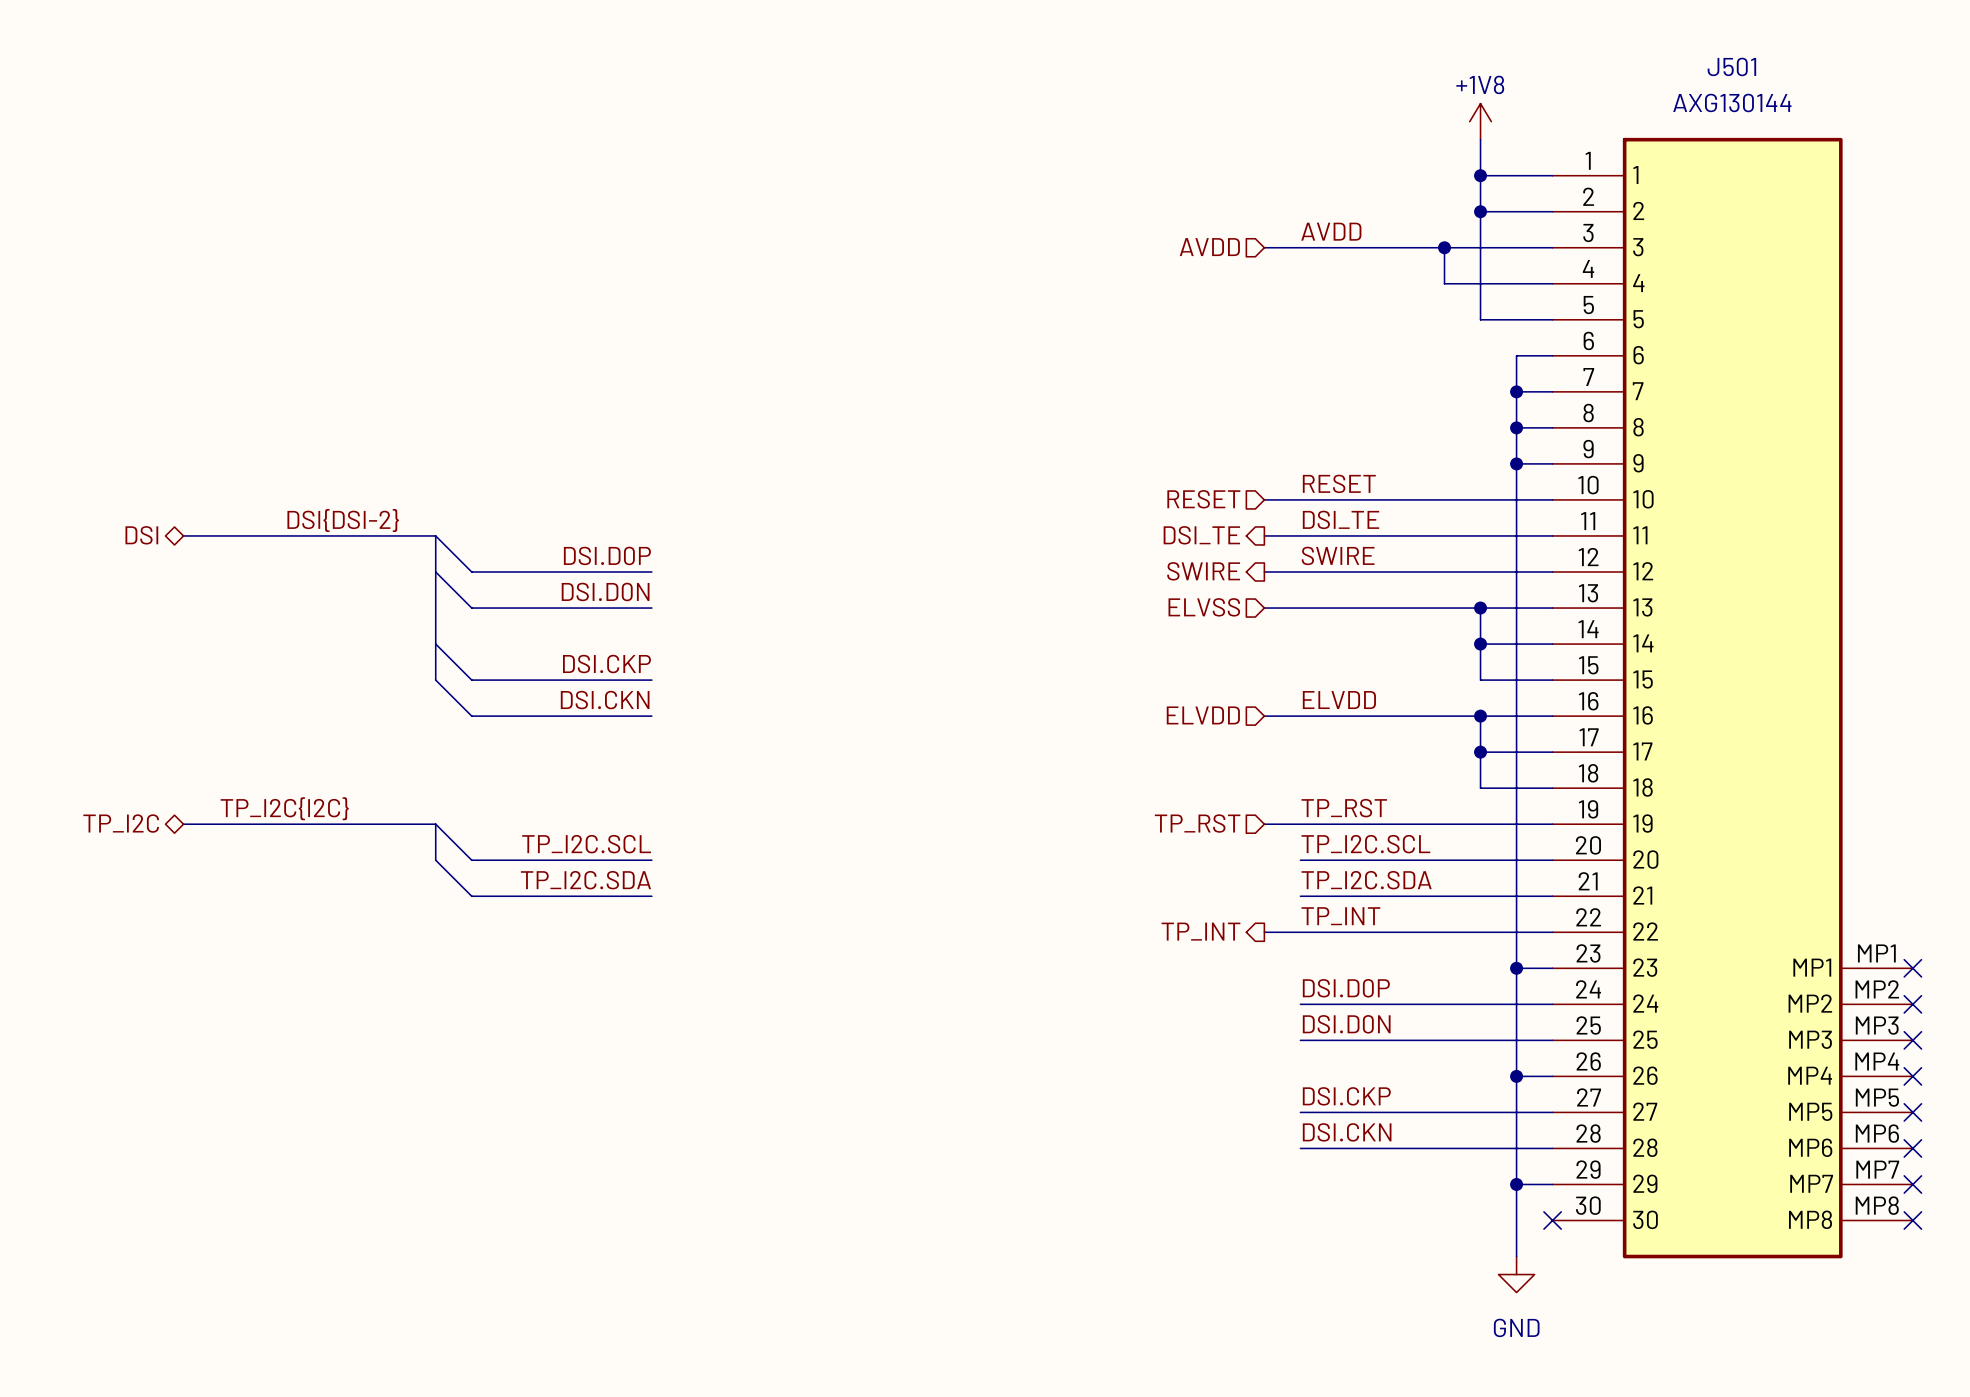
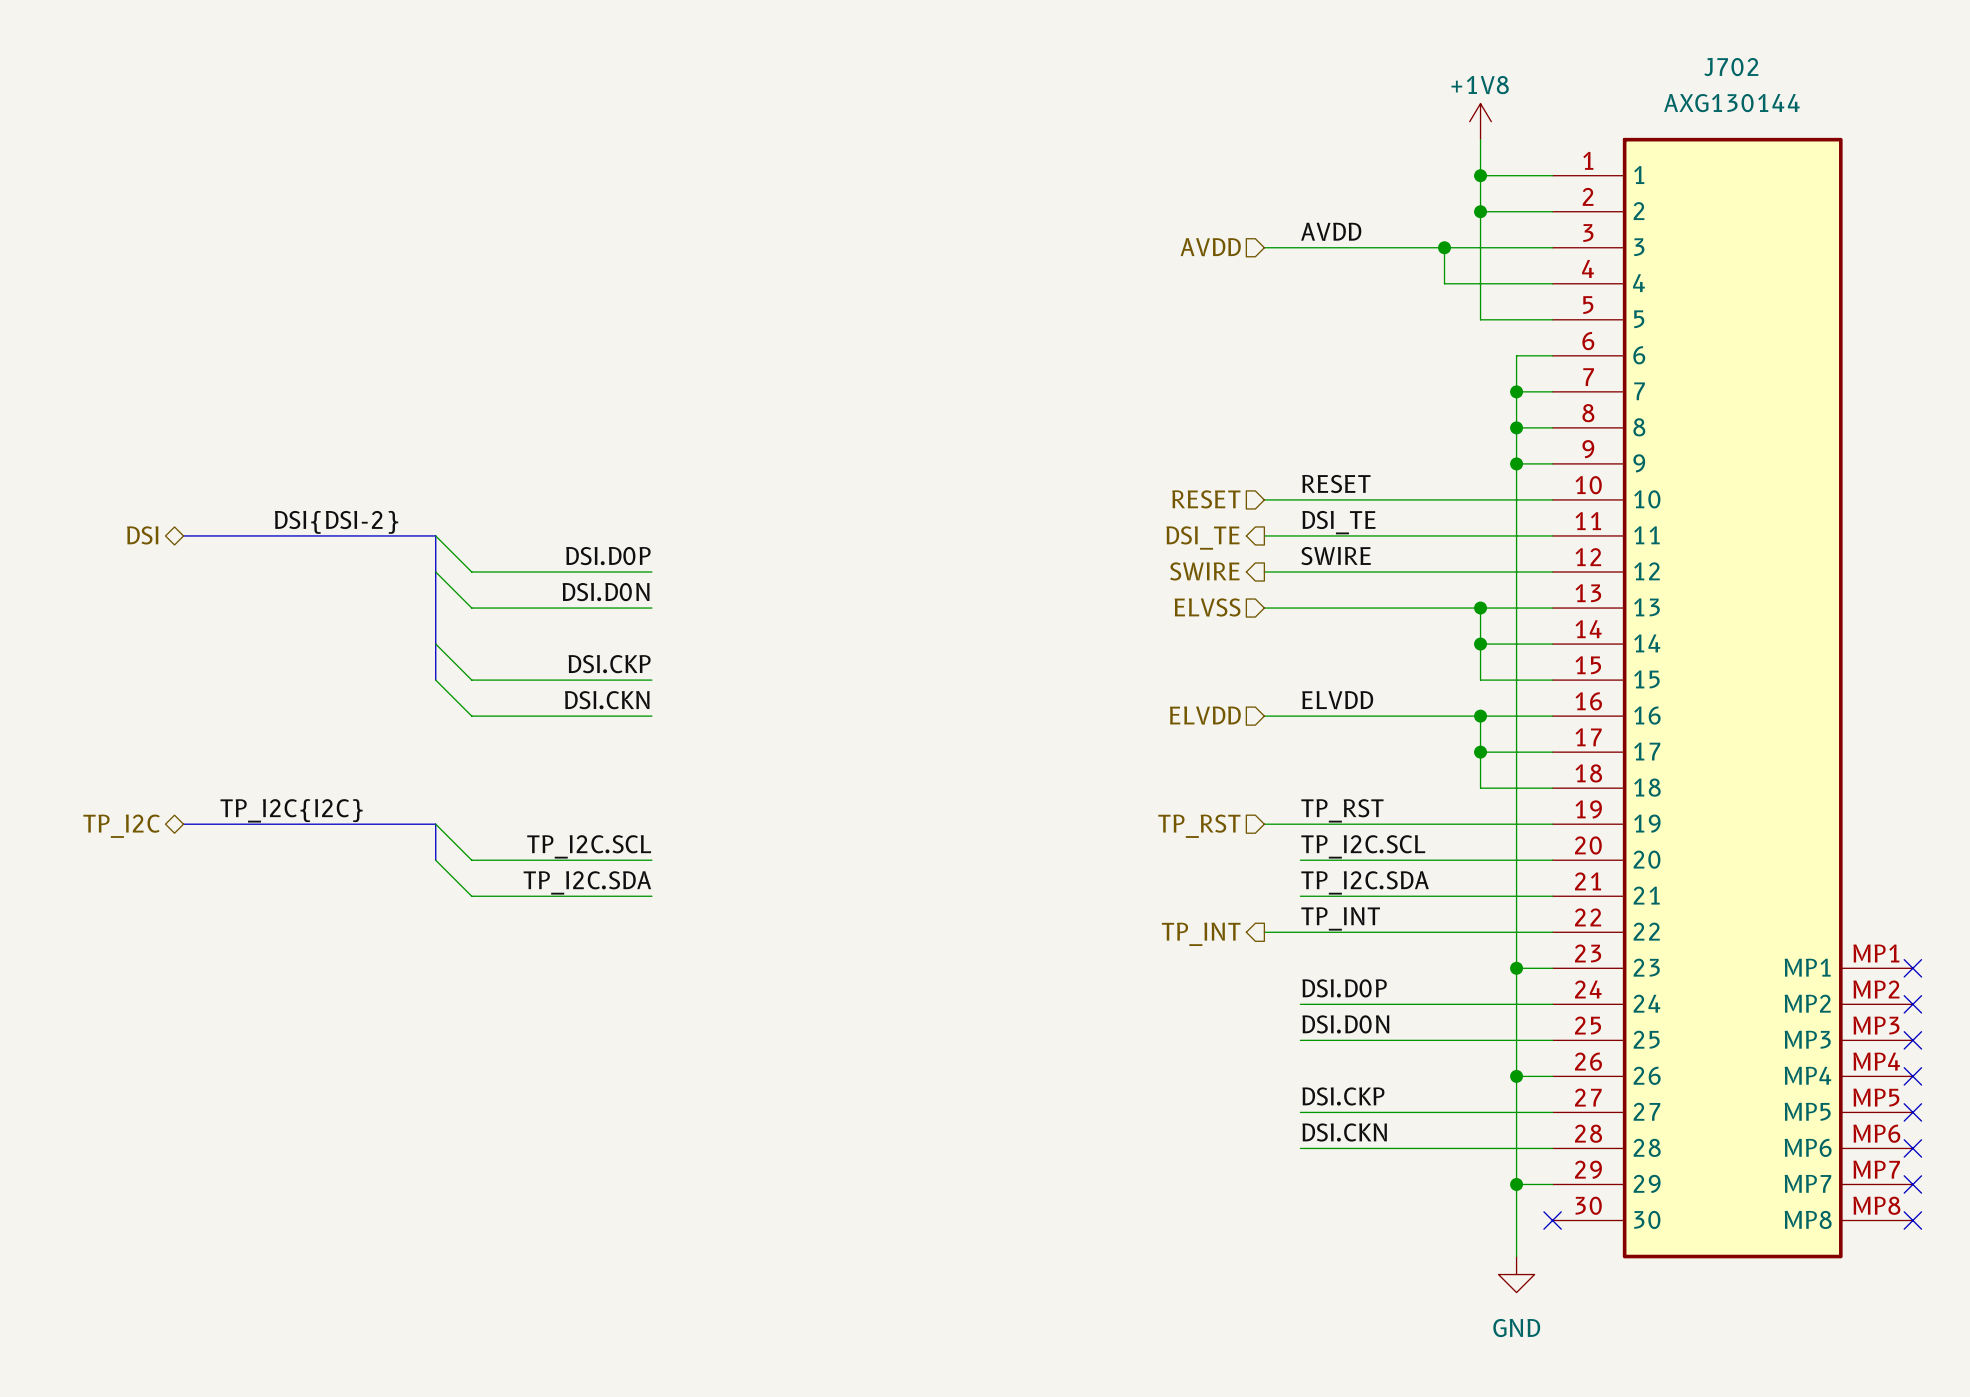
J501 name: J501 (1731, 66) -> J702 (1731, 67)

